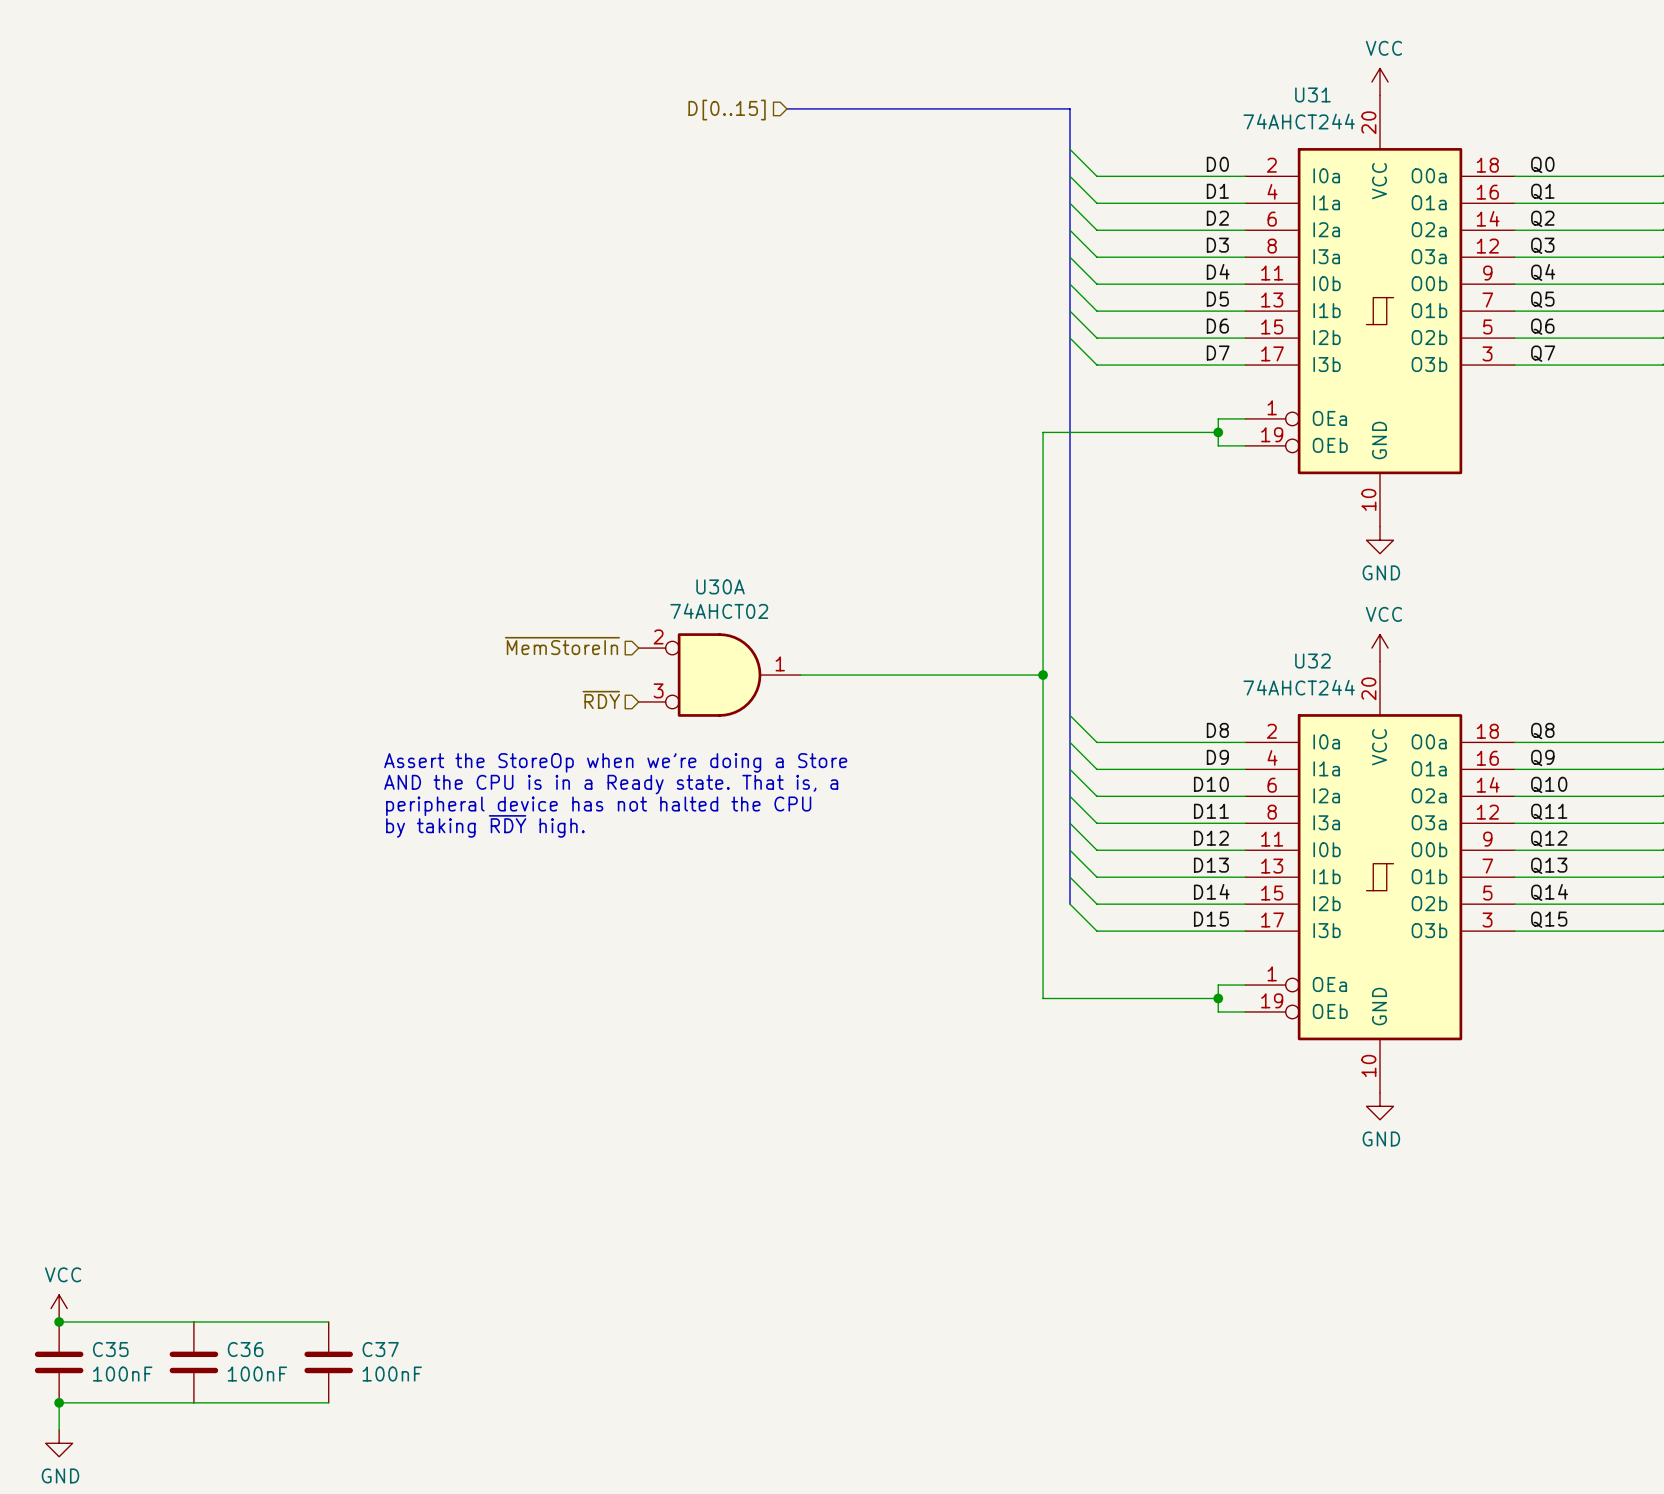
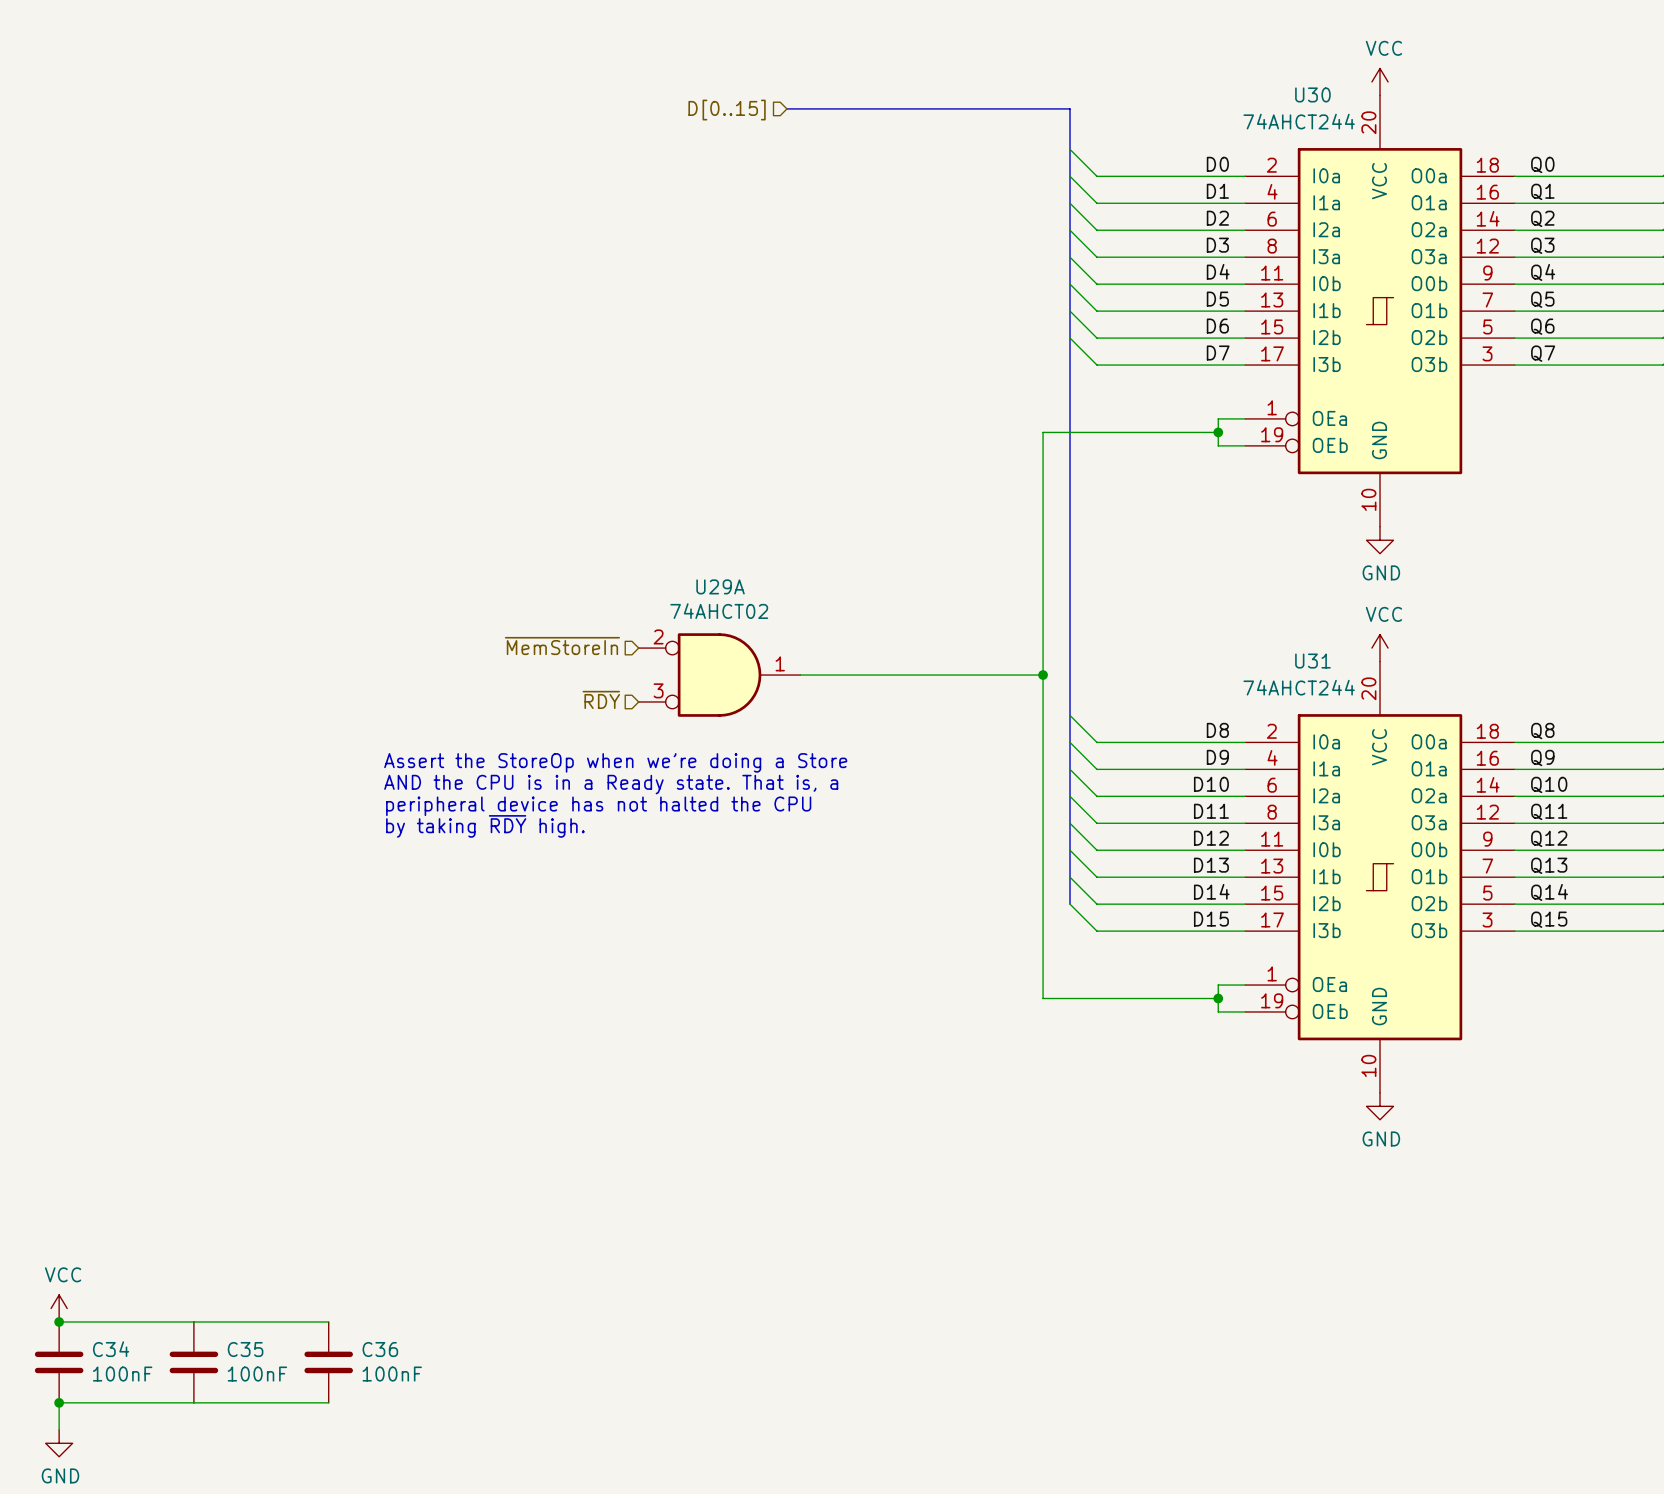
U31 name: U31 (1312, 94) -> U30 (1312, 94)
U30A name: U30A (720, 586) -> U29A (720, 586)
U32 name: U32 (1312, 661) -> U31 (1312, 661)
C35 name: C35 (110, 1349) -> C34 (111, 1349)
C36 name: C36 (245, 1349) -> C35 (245, 1349)
C37 name: C37 (380, 1349) -> C36 (380, 1349)

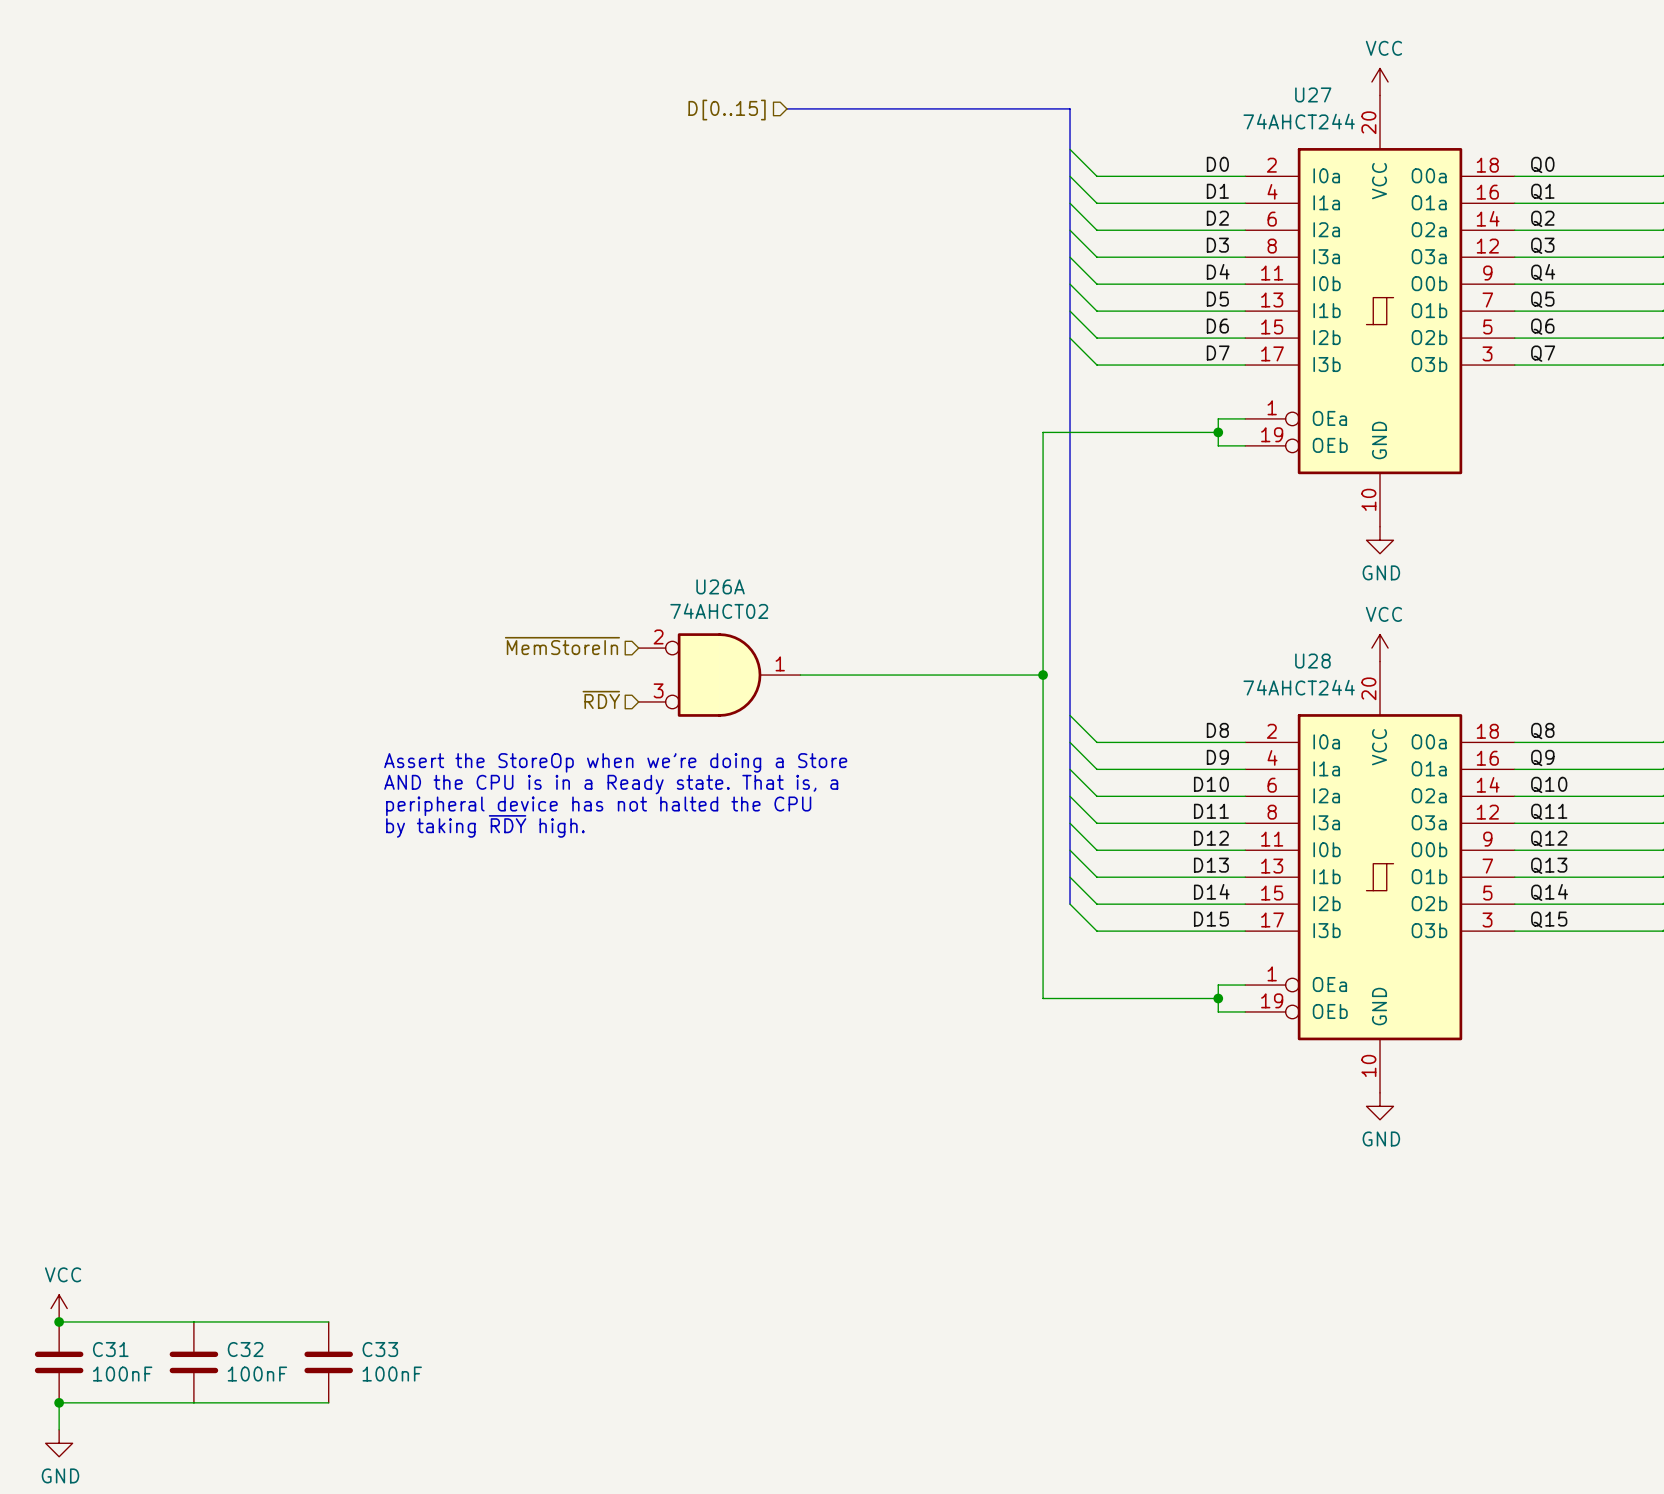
U30 name: U30 (1312, 94) -> U27 (1313, 94)
U29A name: U29A (720, 586) -> U26A (720, 586)
U31 name: U31 (1312, 661) -> U28 (1312, 661)
C34 name: C34 (111, 1349) -> C31 (110, 1349)
C35 name: C35 (245, 1349) -> C32 (245, 1349)
C36 name: C36 (380, 1349) -> C33 (380, 1349)

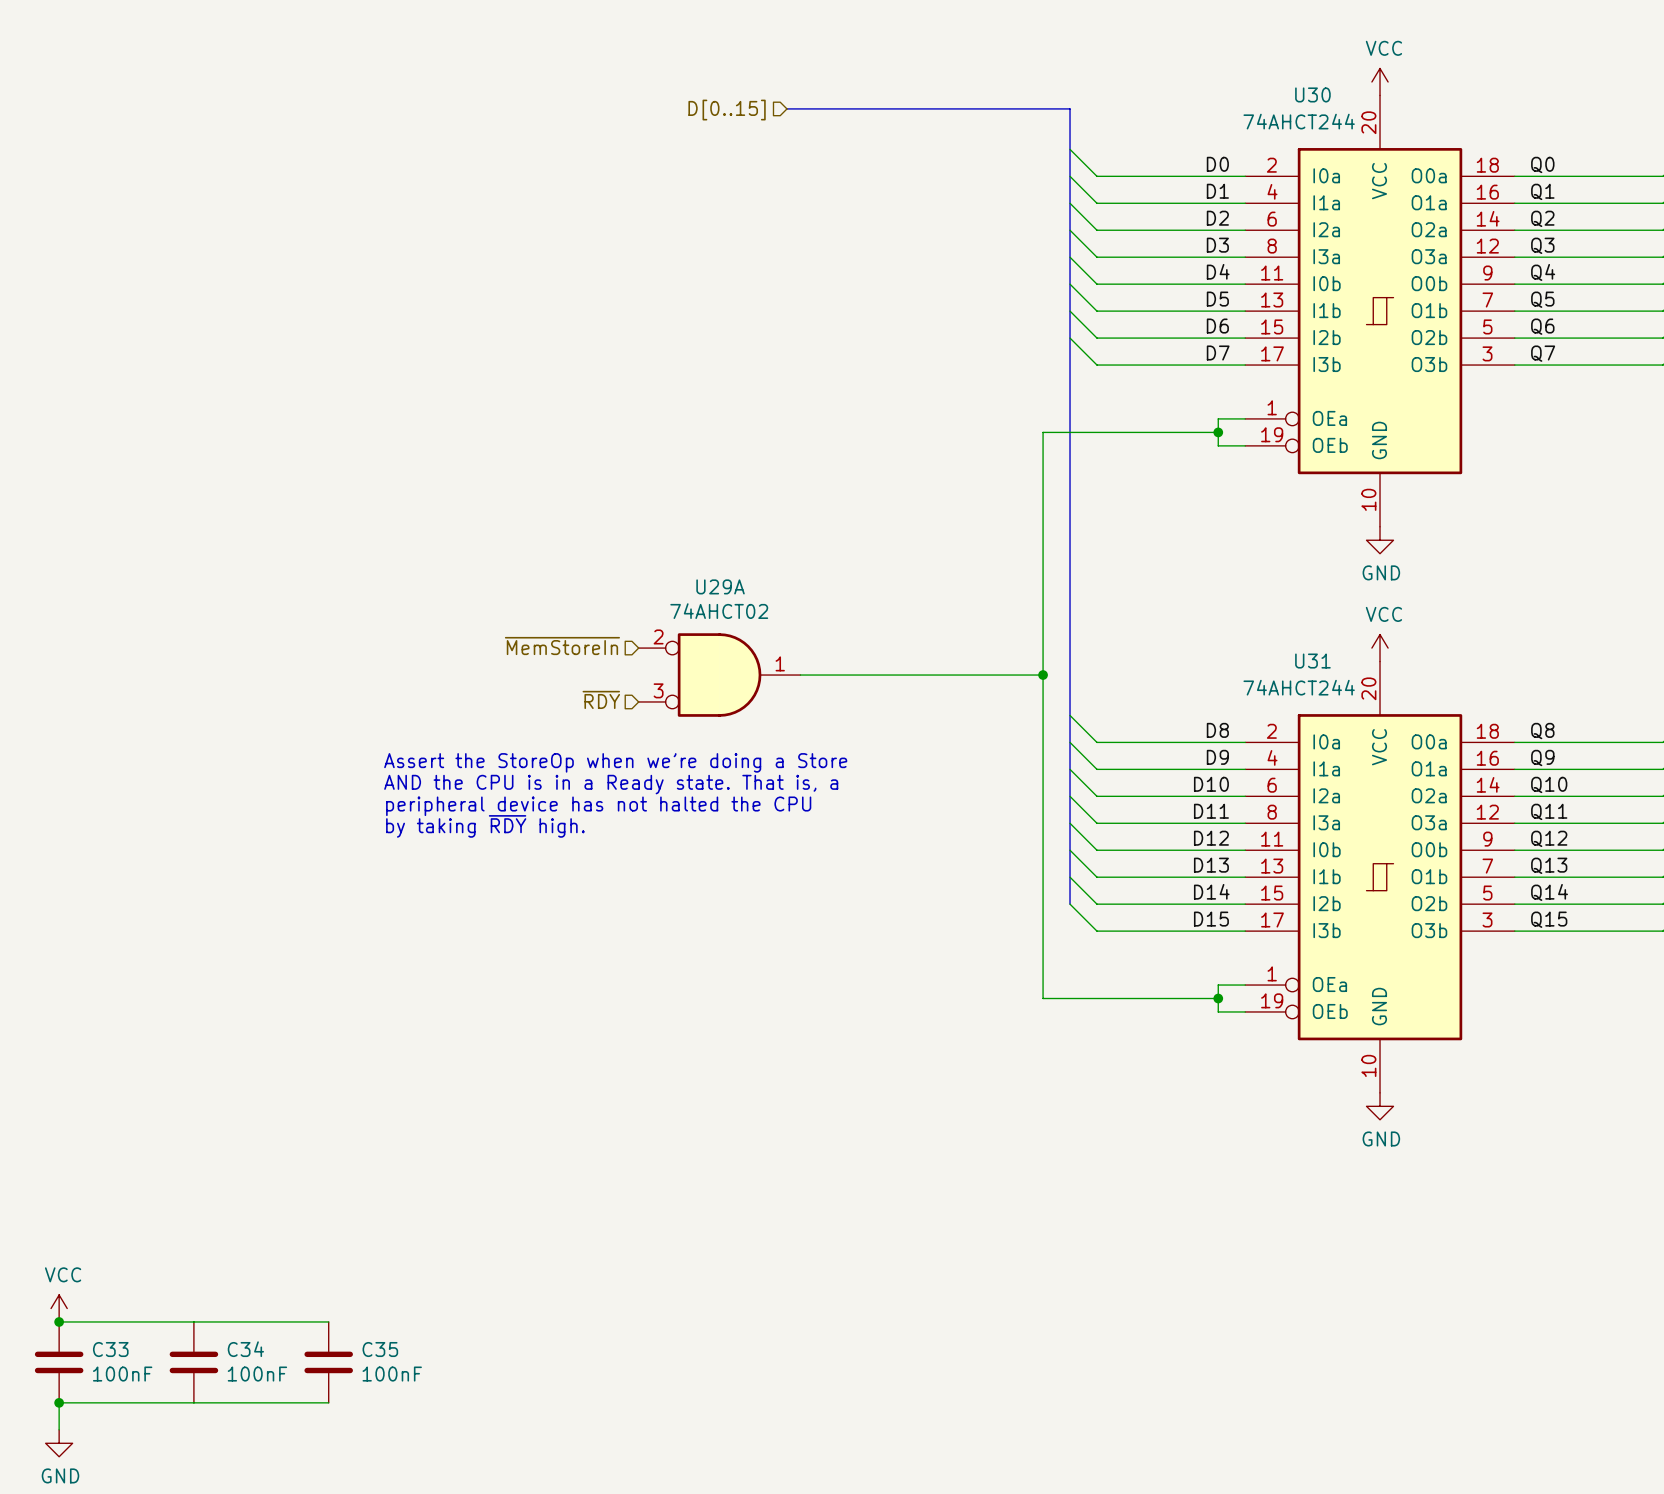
U27 name: U27 (1313, 94) -> U30 (1312, 94)
U26A name: U26A (720, 586) -> U29A (720, 586)
U28 name: U28 (1312, 661) -> U31 (1312, 661)
C31 name: C31 (110, 1349) -> C33 (110, 1349)
C32 name: C32 (245, 1349) -> C34 (245, 1349)
C33 name: C33 (380, 1349) -> C35 (380, 1349)

